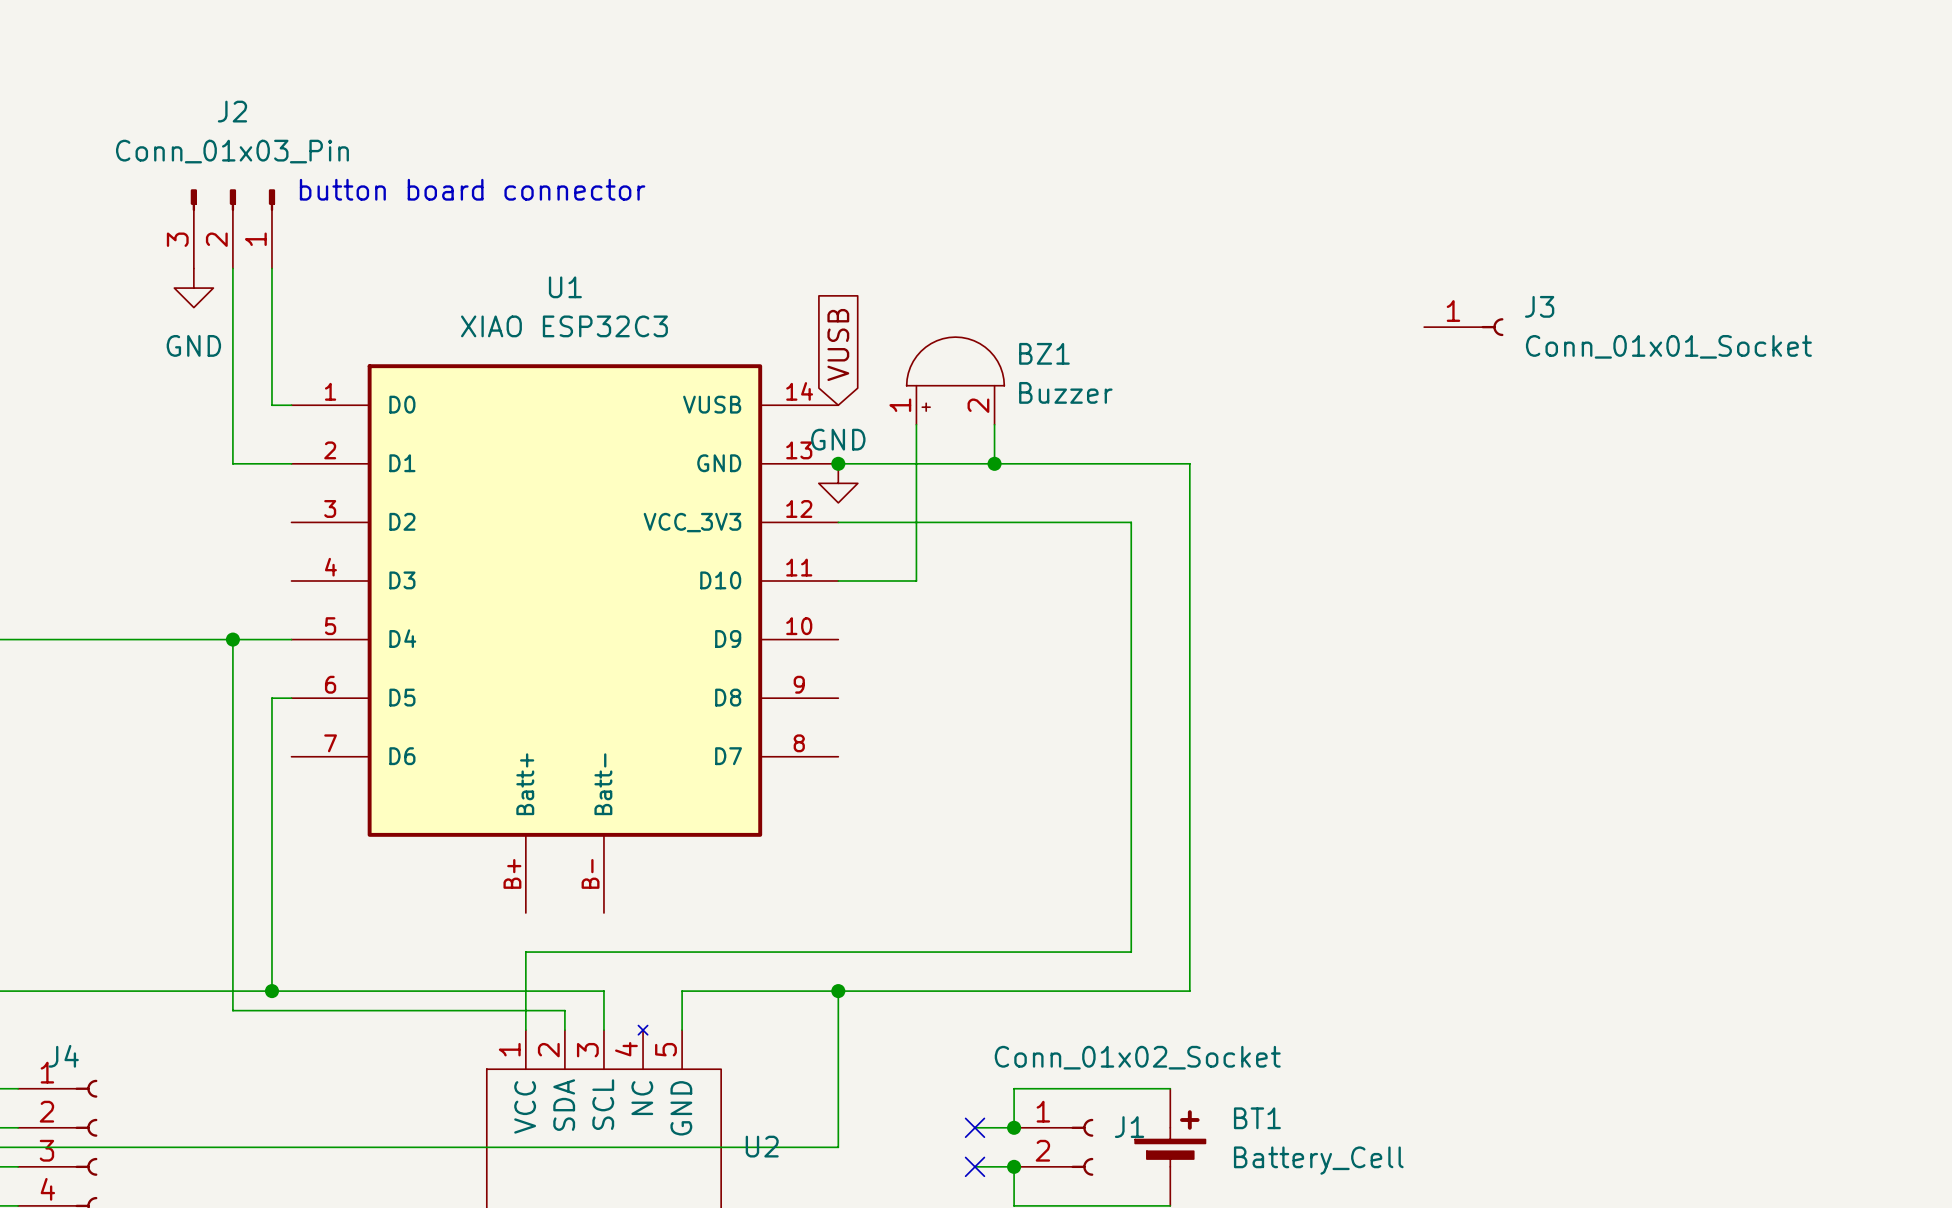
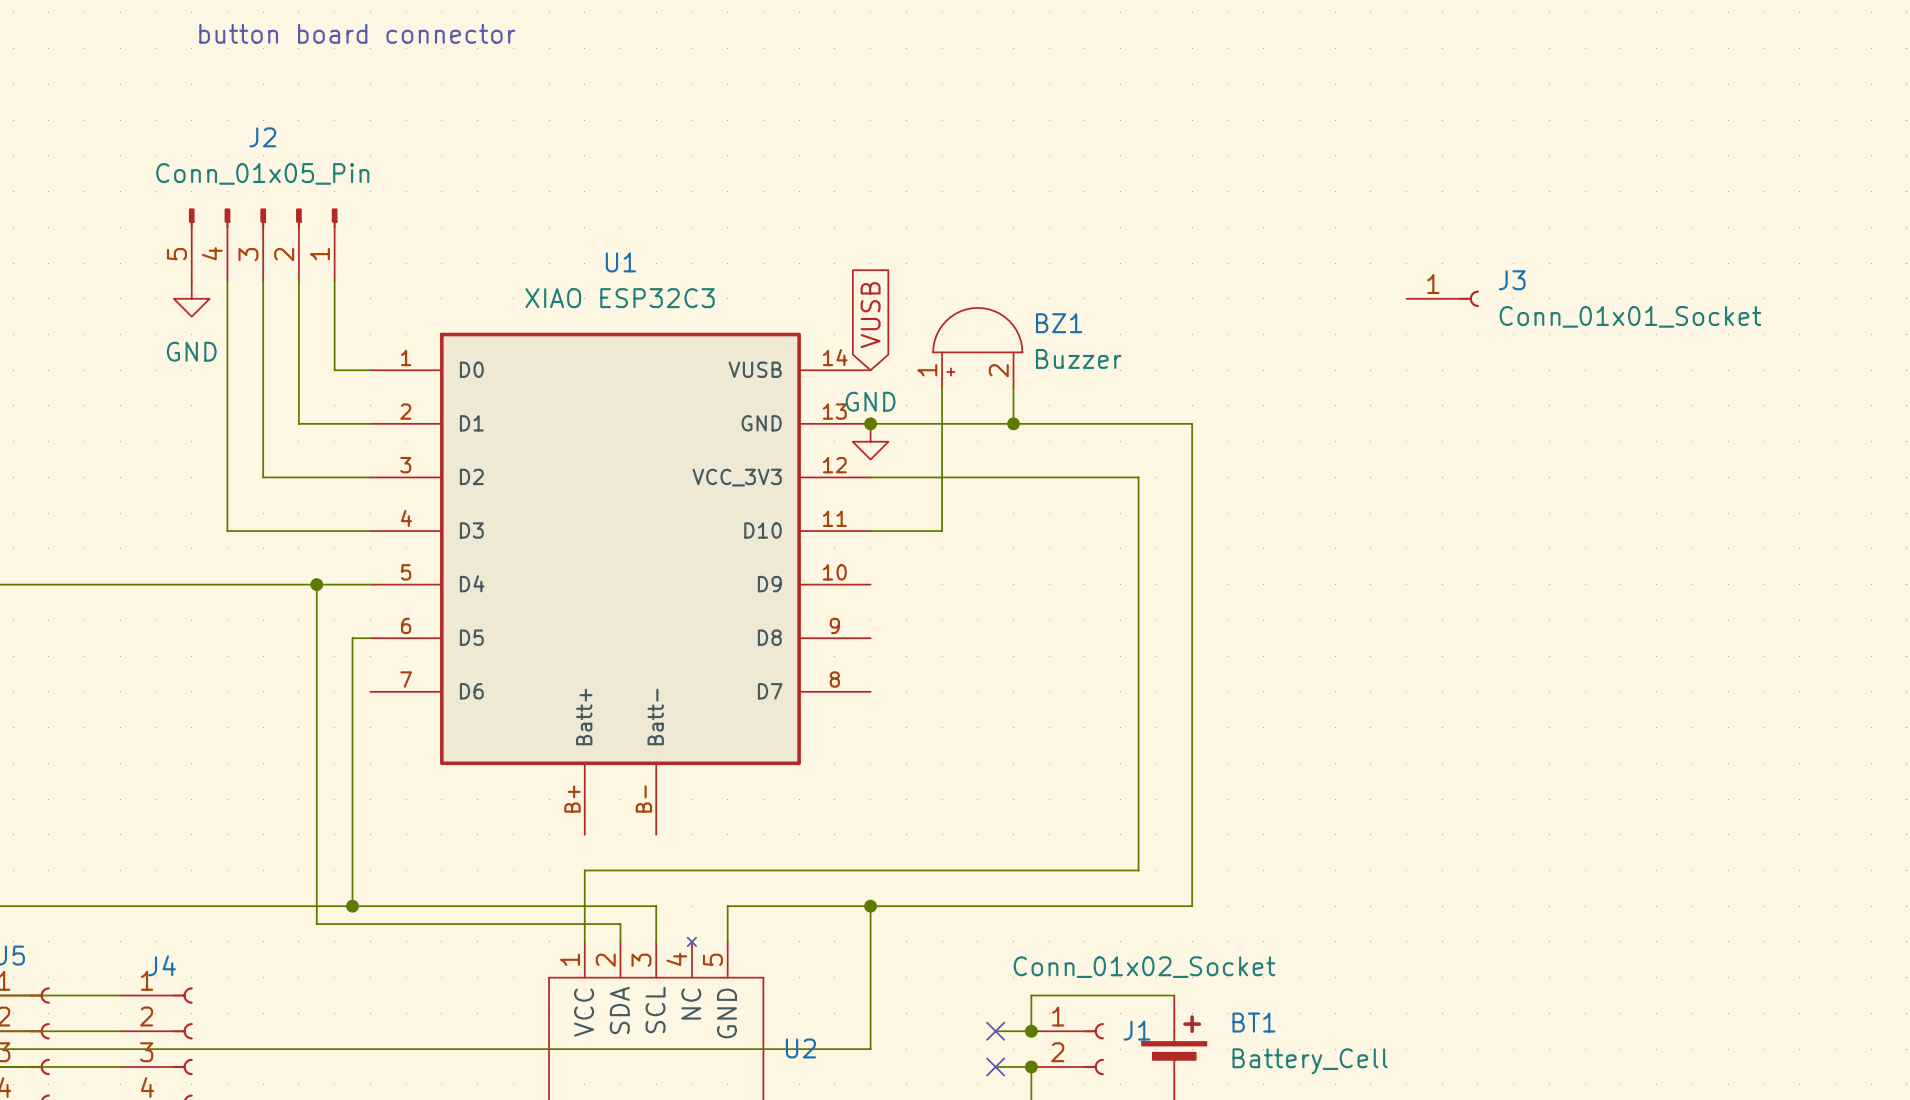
J2 value: Conn_01x03_Pin (232, 151) -> Conn_01x05_Pin (262, 173)
J2 symbol: [190, 189, 276, 269] -> [188, 208, 338, 281]
text position: button board connector (472, 189) -> button board connector (357, 33)
wire: (232, 268) (232, 463) -> (298, 280) (298, 423) (316, 423)
wire: (271, 268) (271, 405) -> (334, 280) (334, 370) (352, 370)
power symbol position: GND (193, 288) -> GND (191, 298)
wire: none -> (227, 280) (227, 531) (370, 531)
wire: none -> (263, 280) (263, 477) (370, 477)

